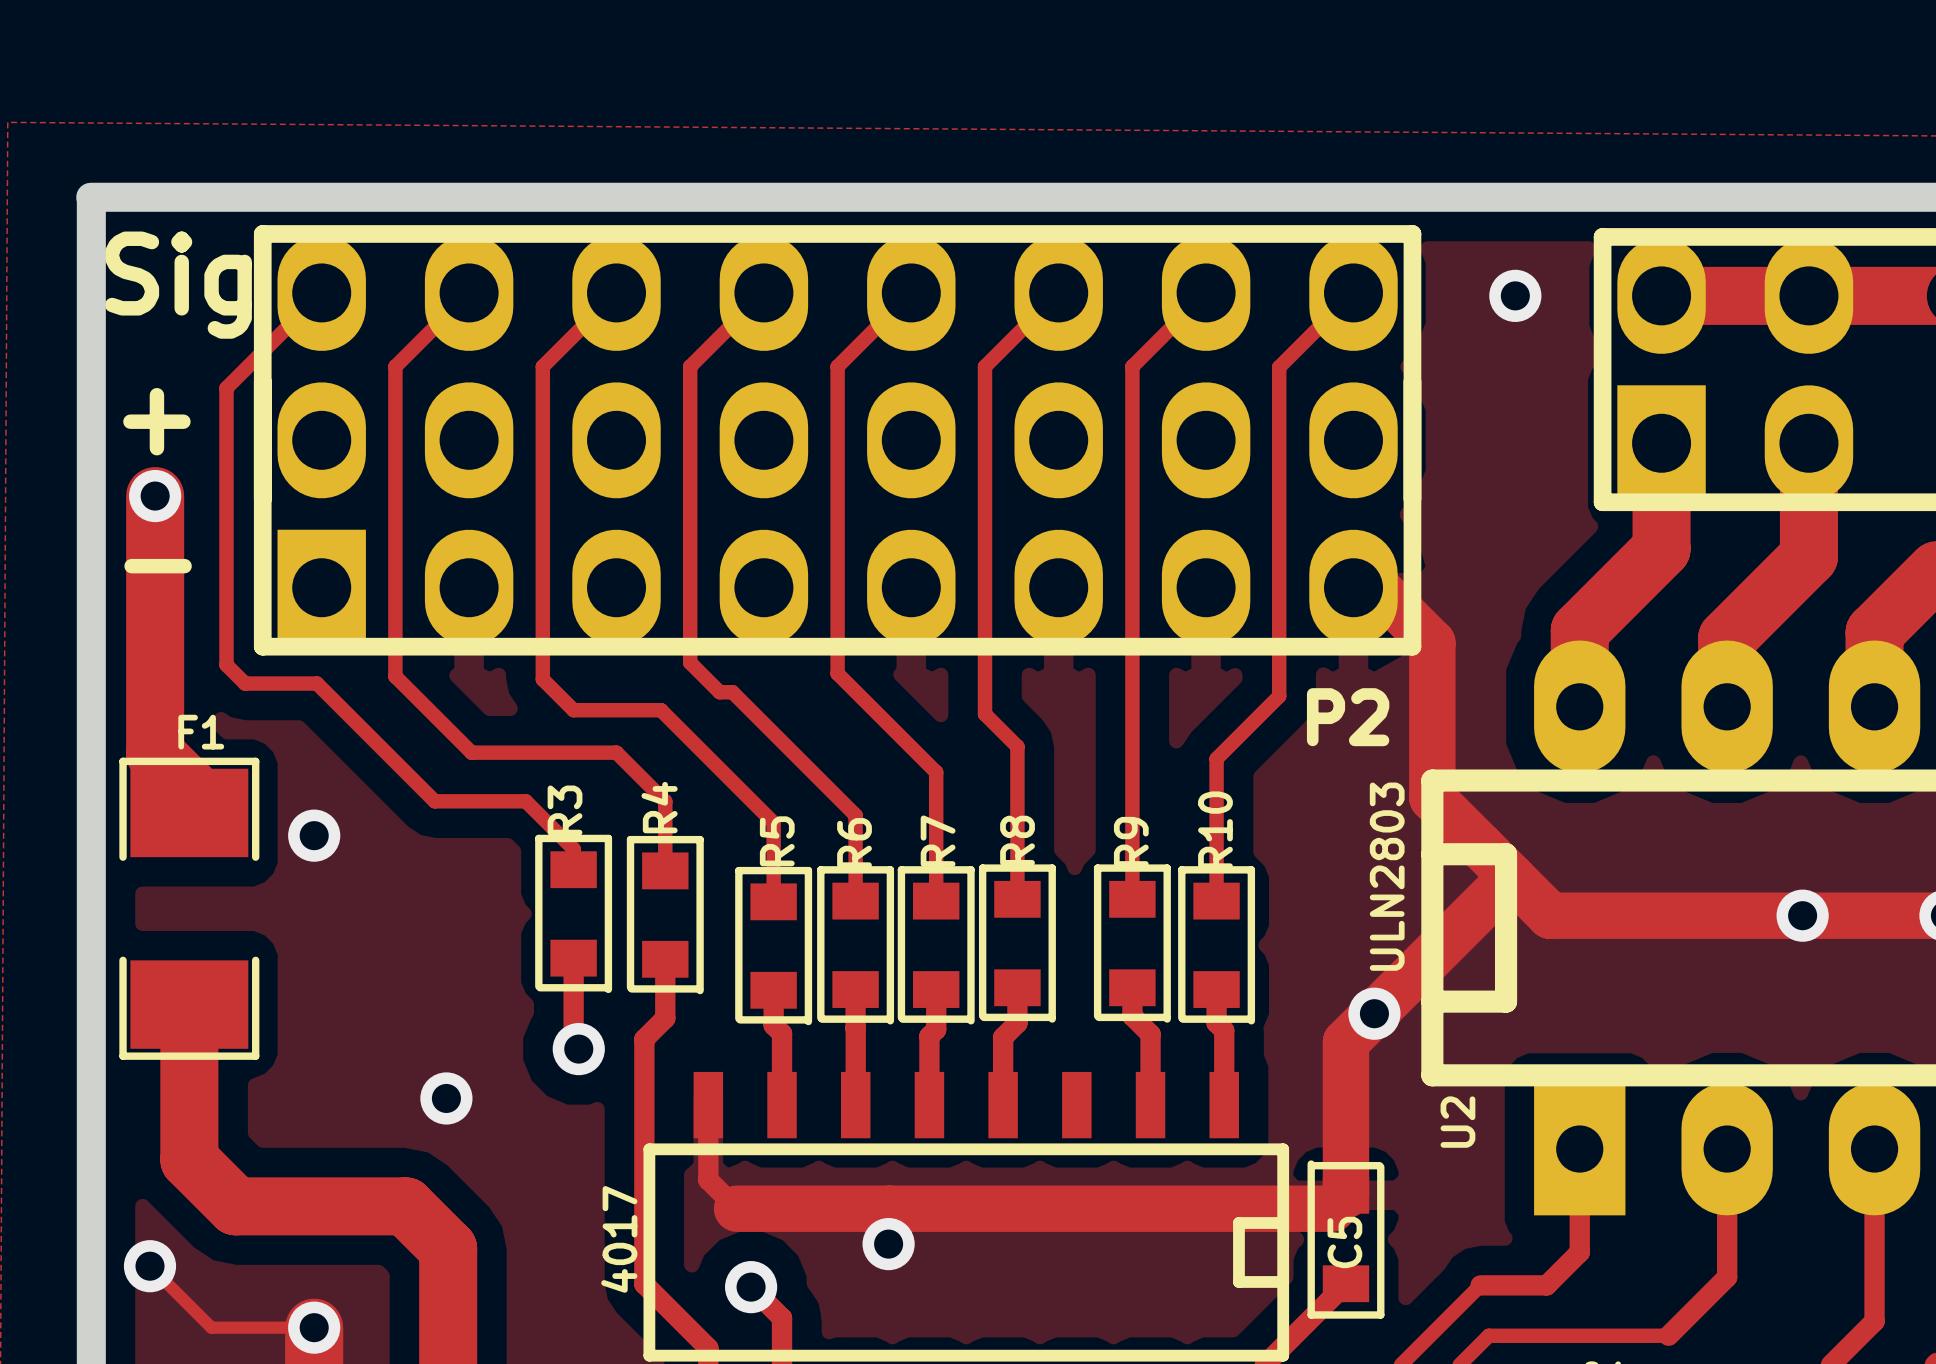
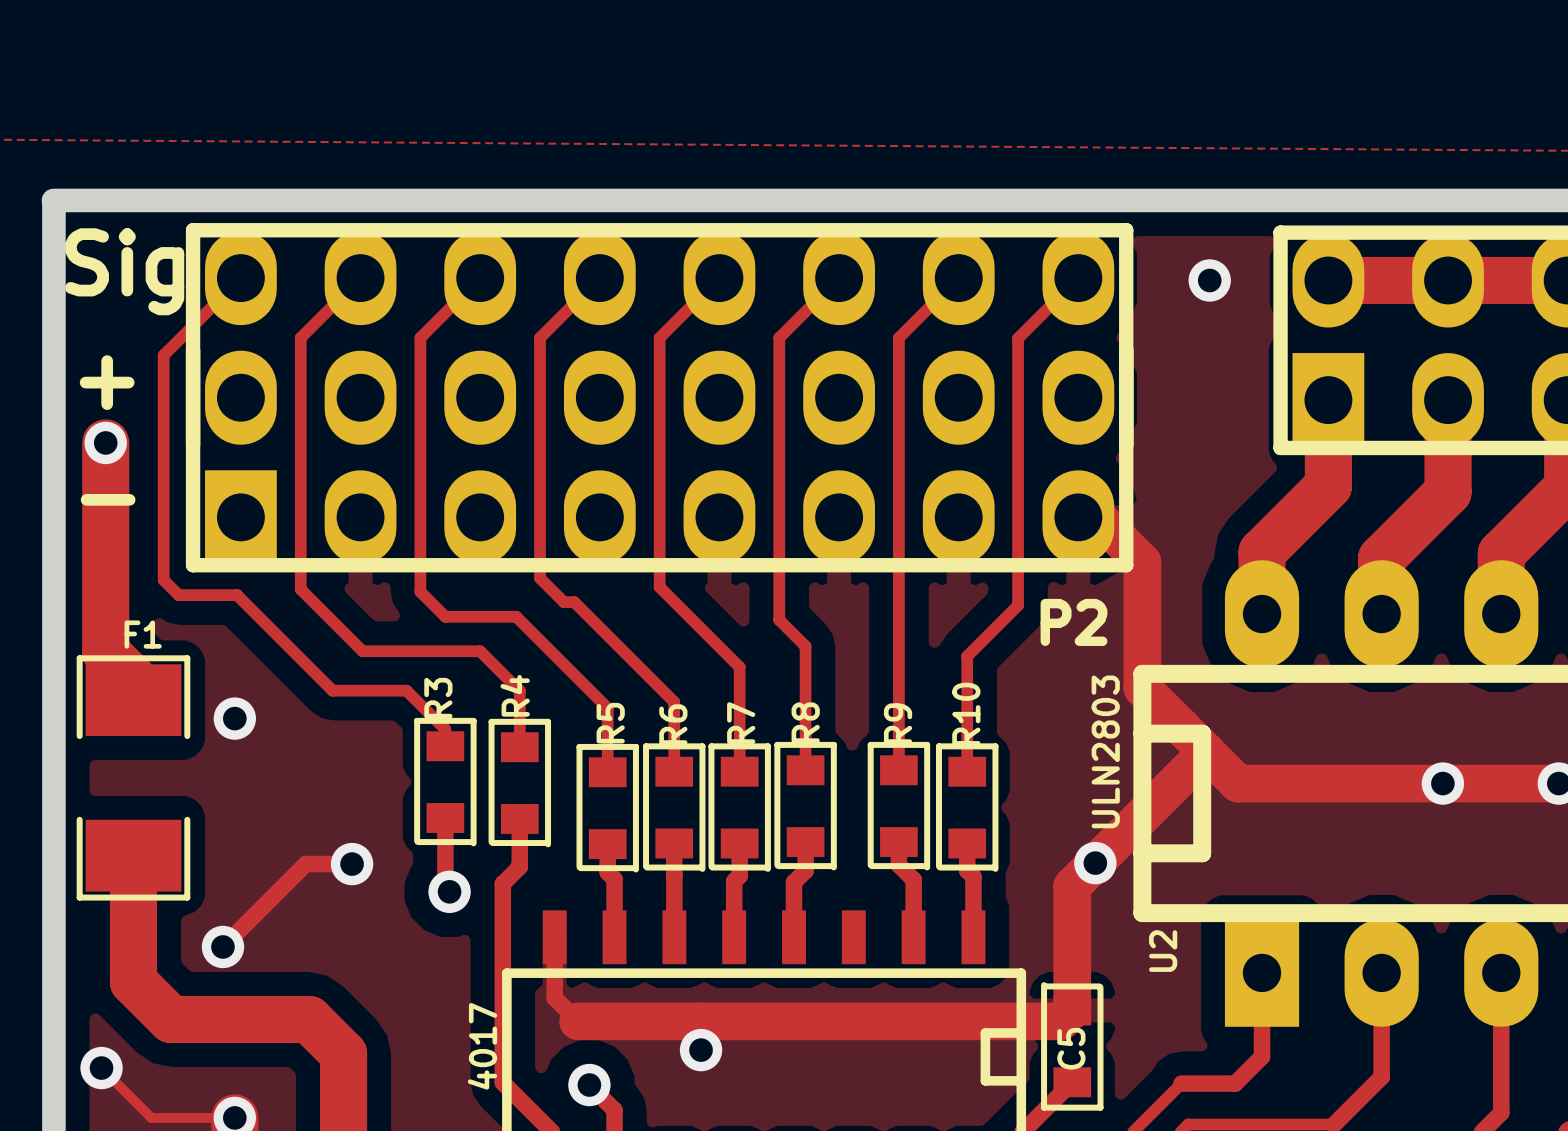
track: none -> (352, 864) (305, 864) (222, 946)
via: none -> (352, 864)
via: (446, 1098) -> none
via: none -> (222, 946)

